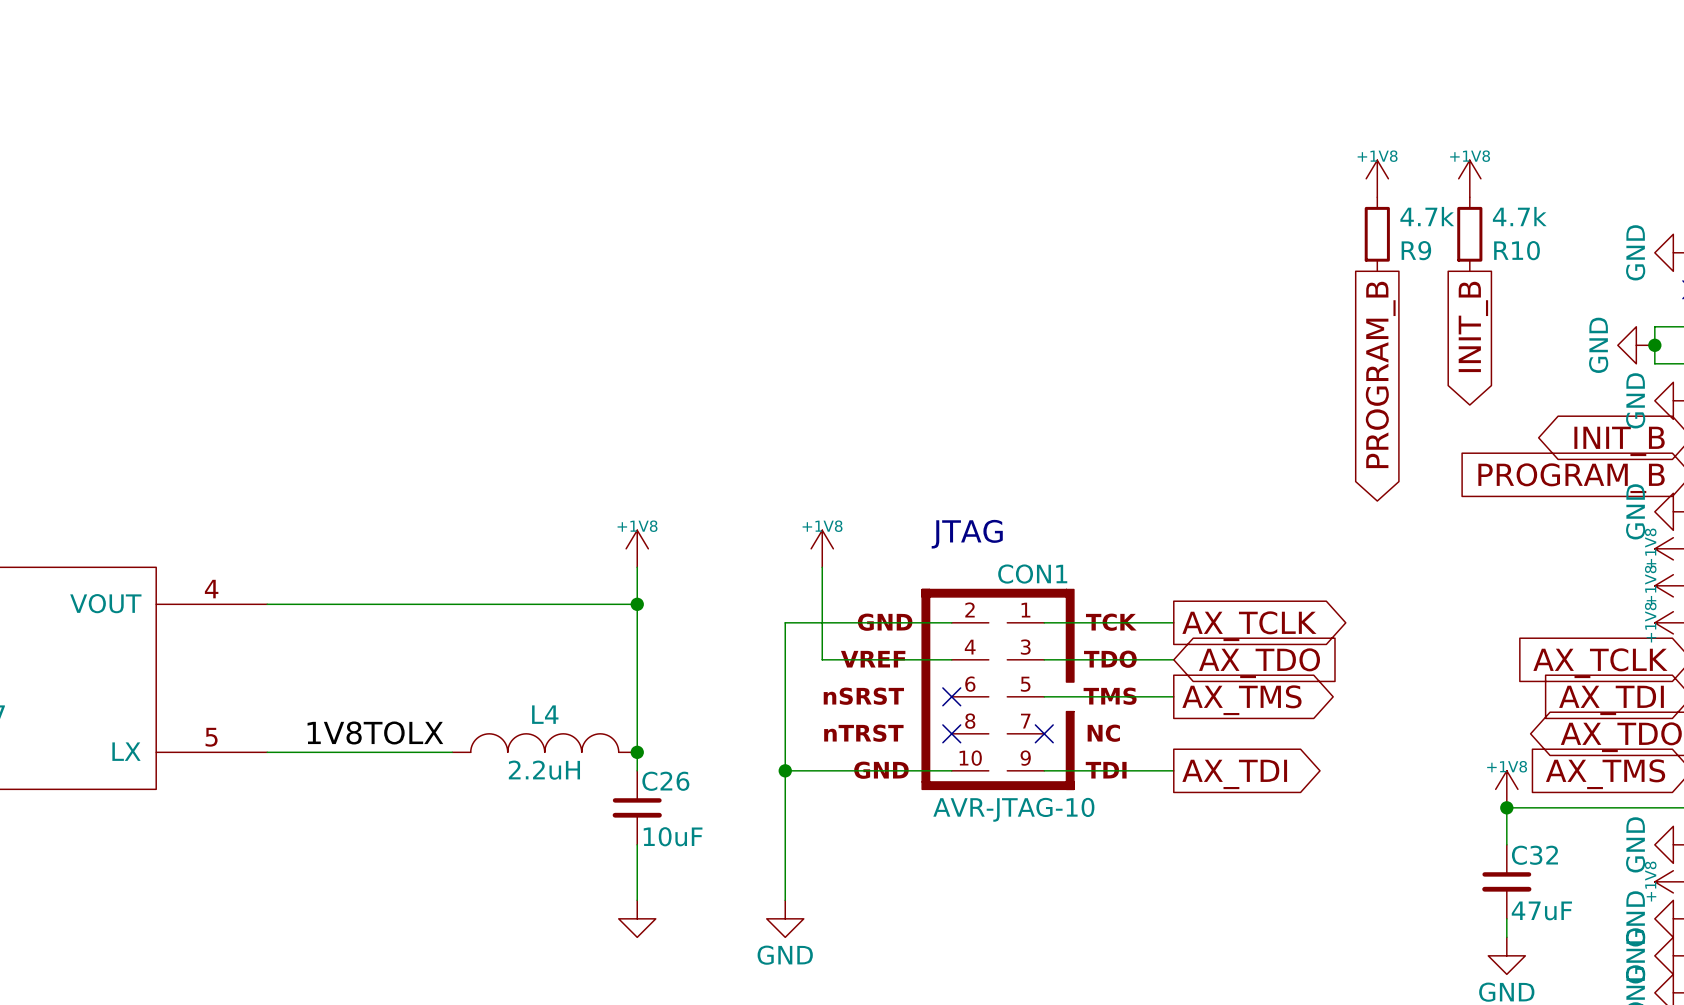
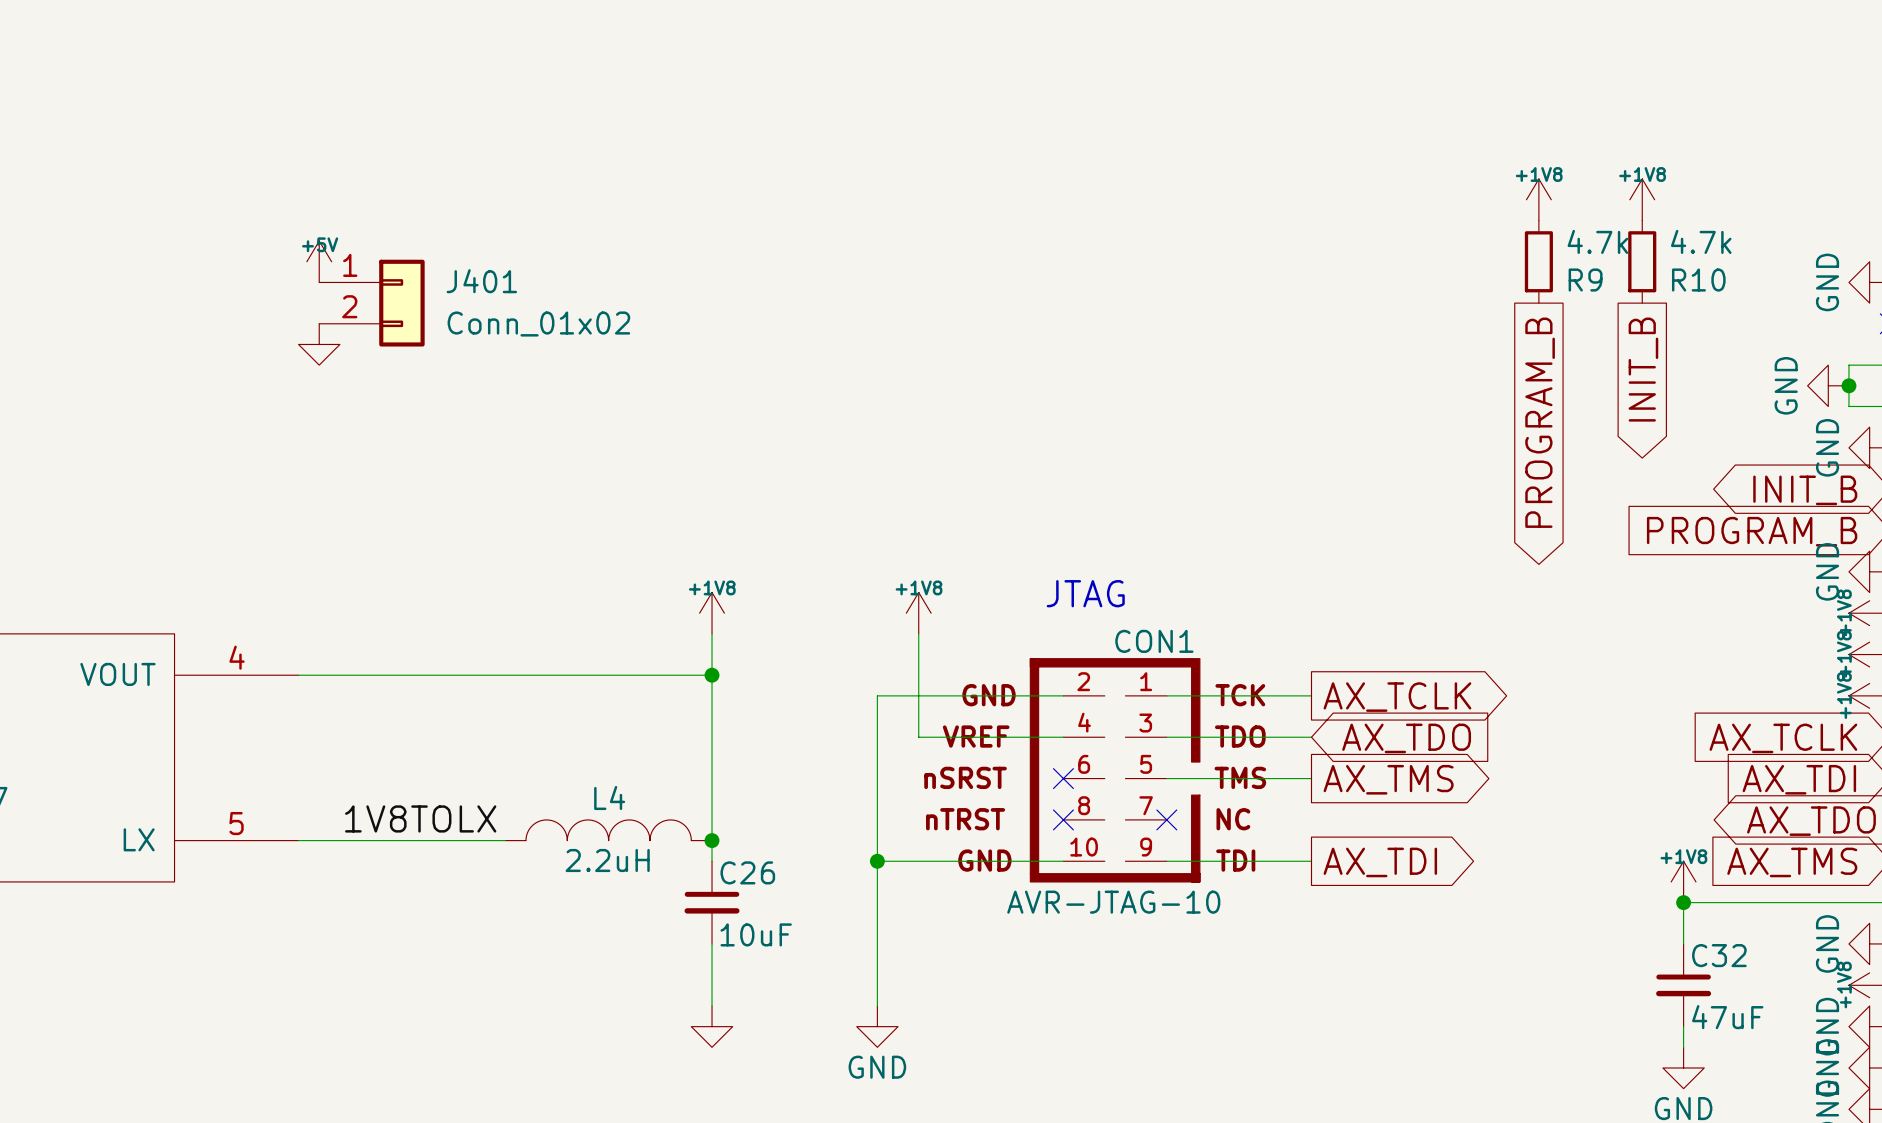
power symbol: none -> +5V (319, 261)
J401: none -> Conn_01x02 (371, 303)
power symbol: none -> (319, 344)

